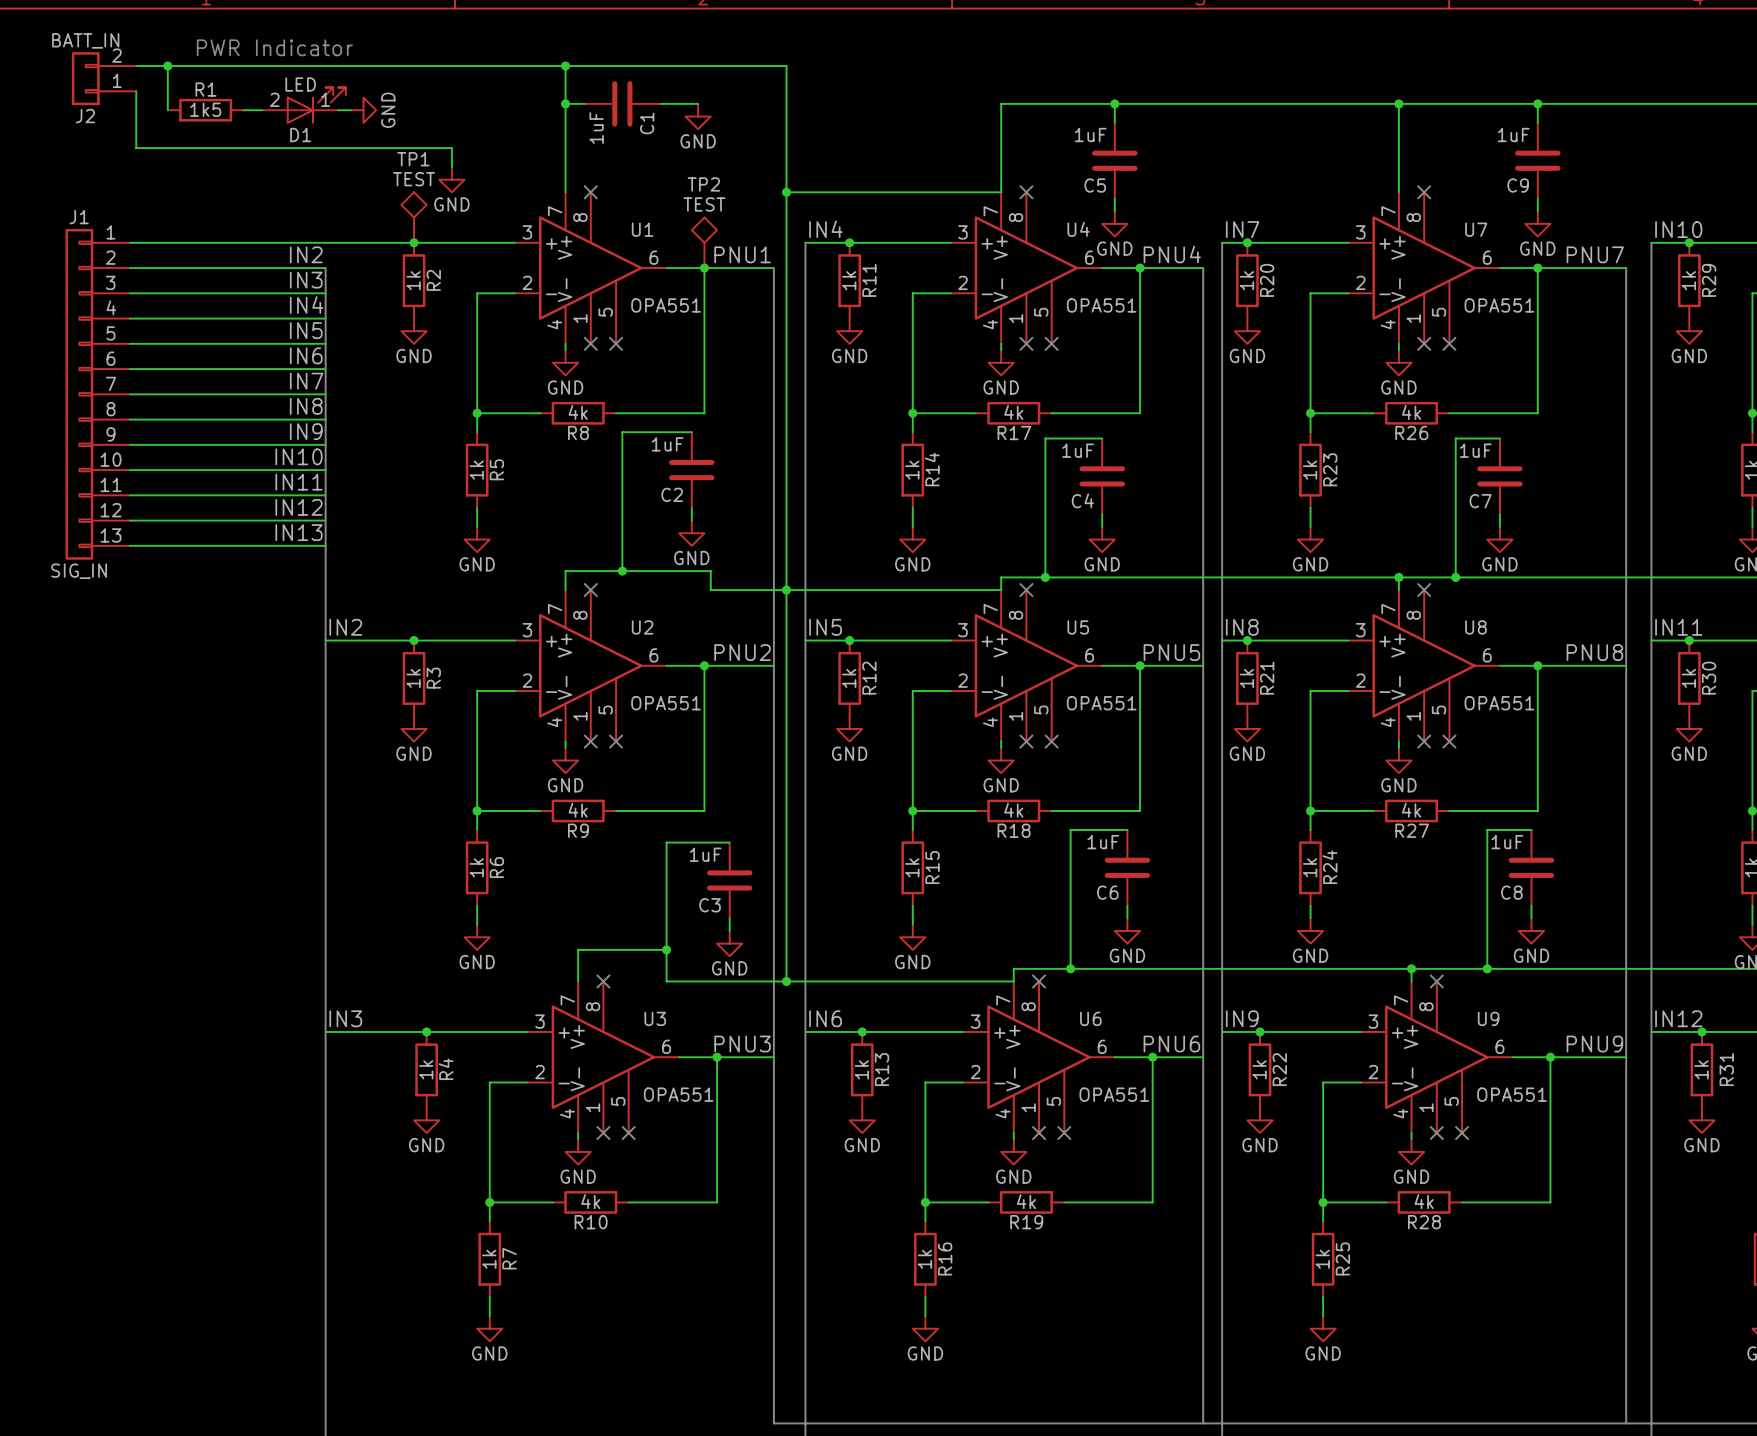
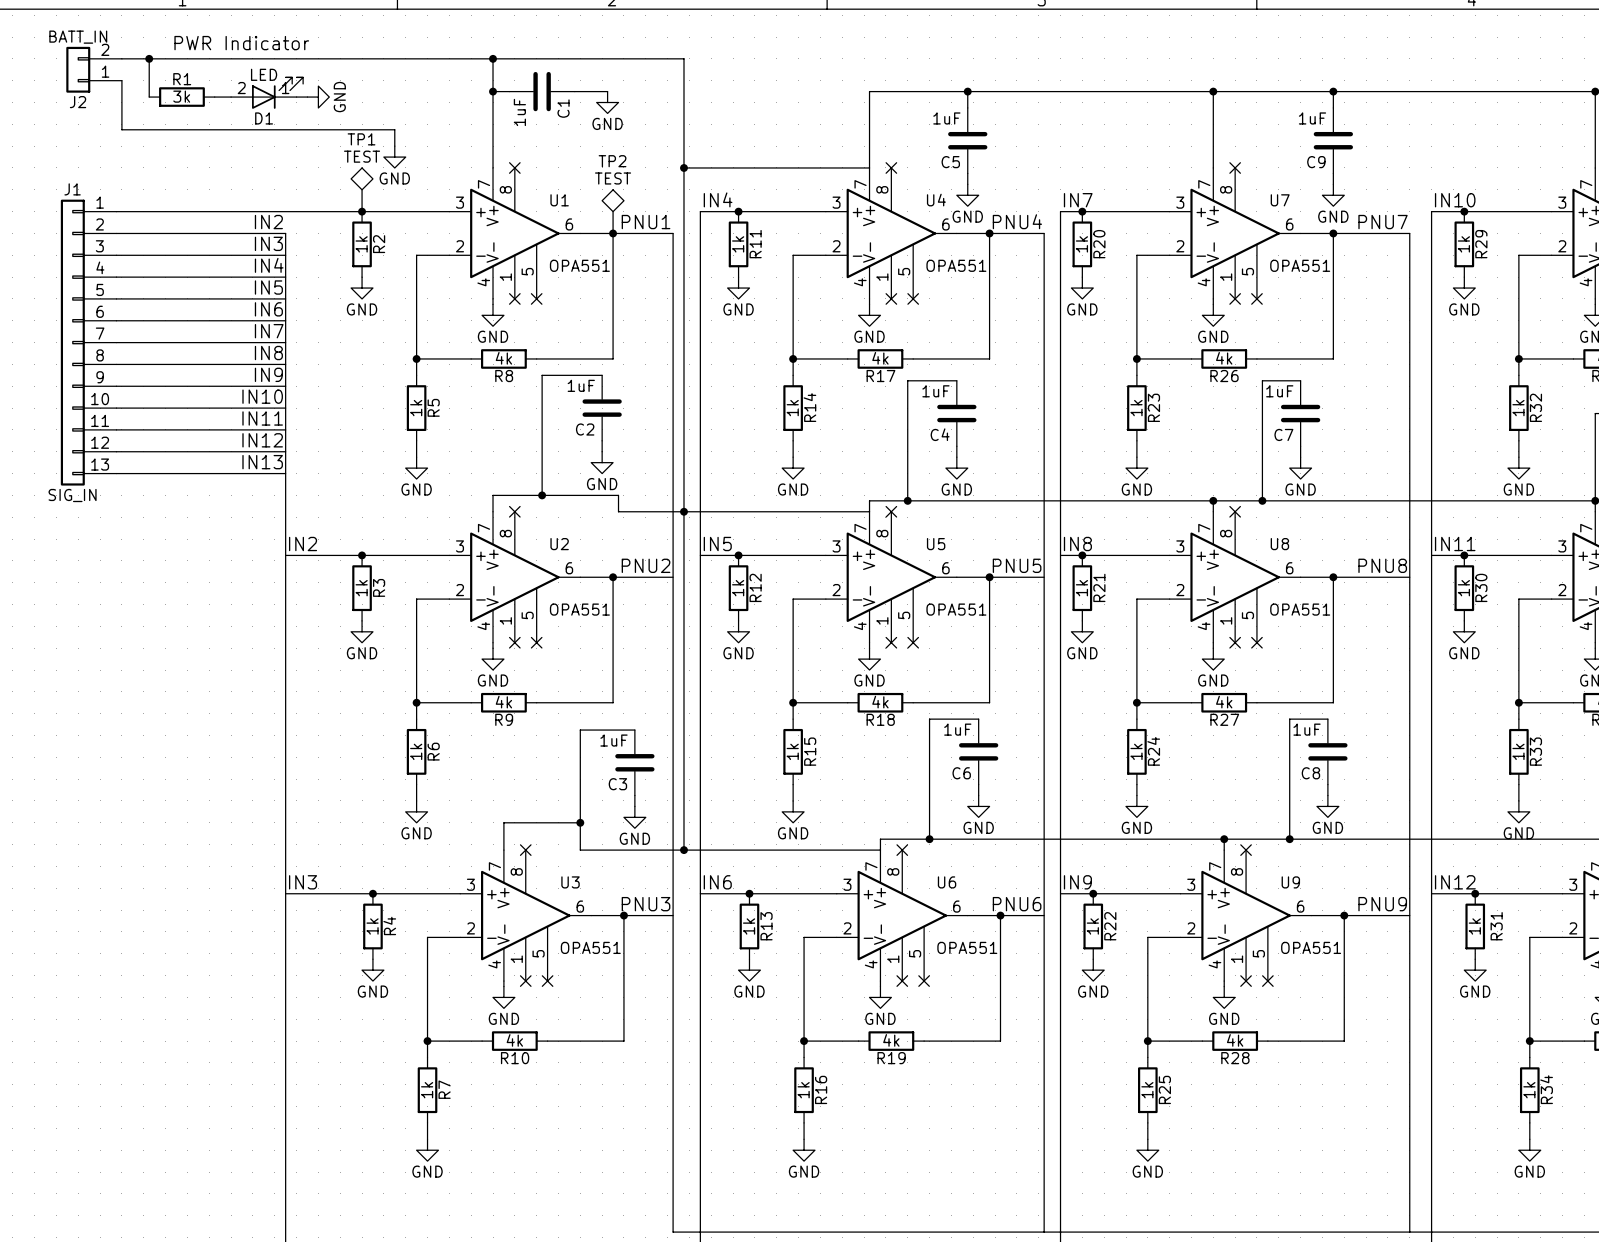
R1 value: 1k5 (205, 109) -> 3k (181, 96)

